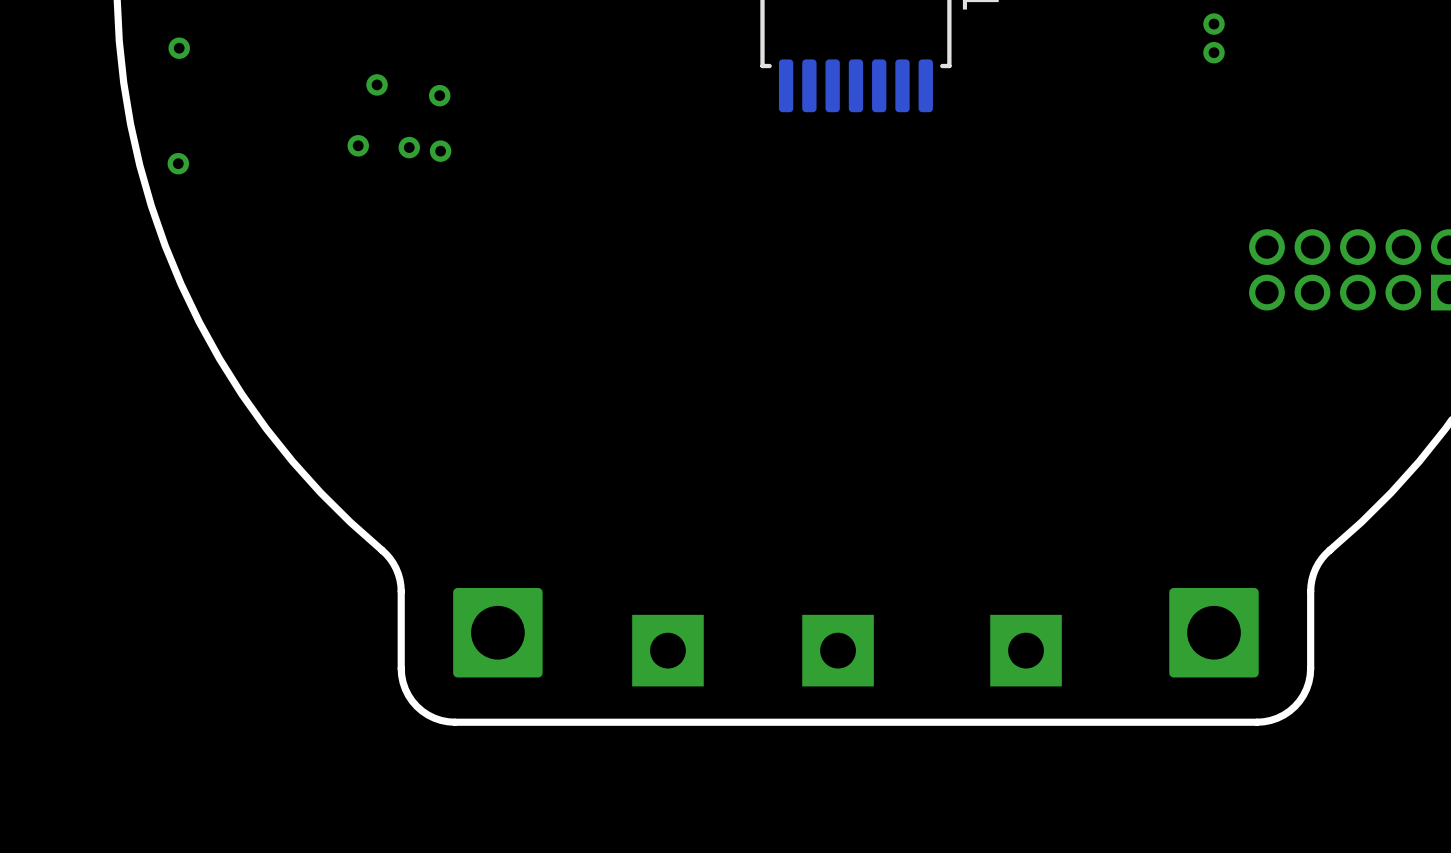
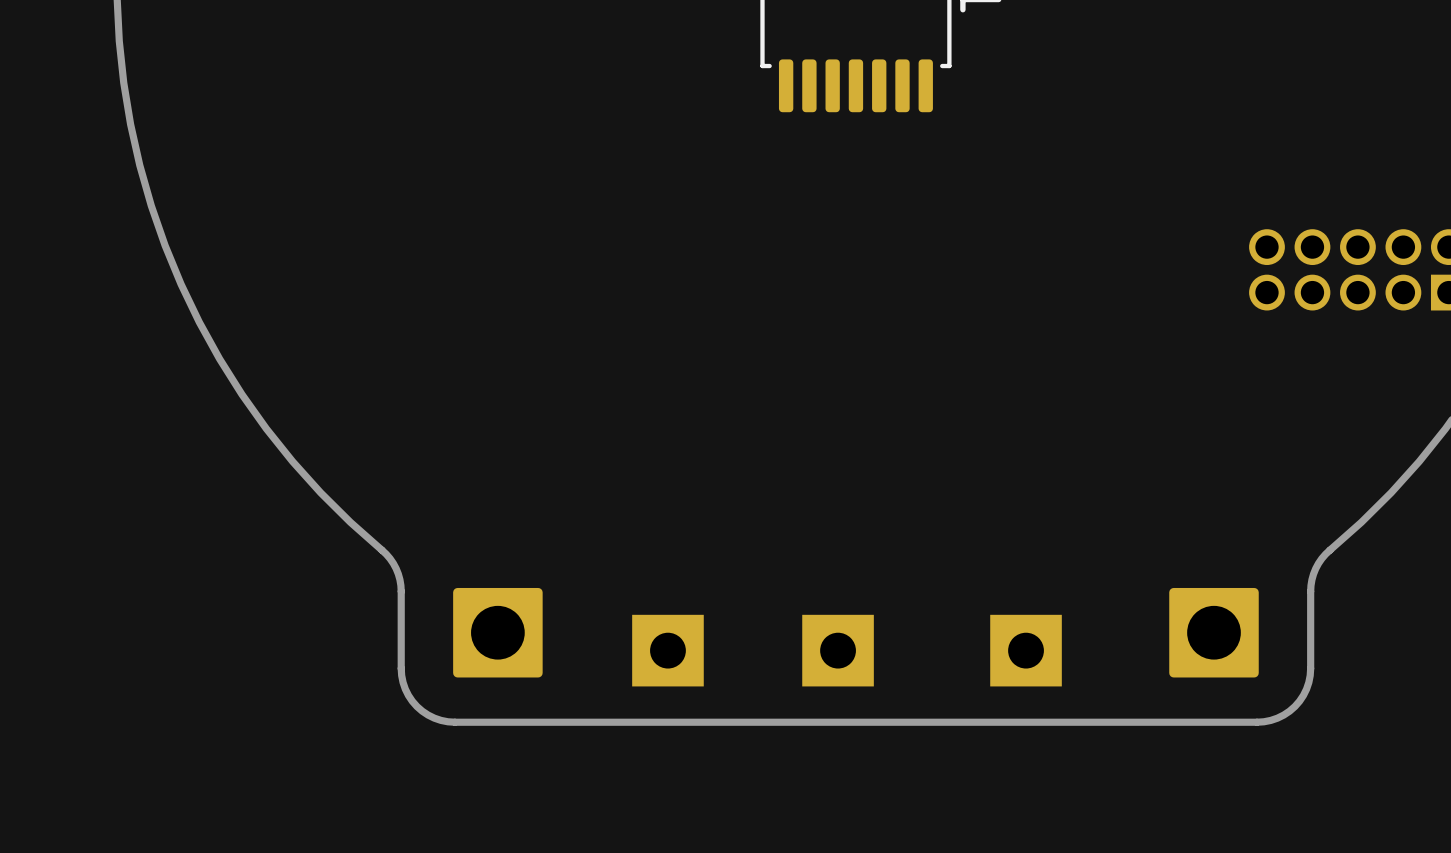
via: (1213, 24) -> none
via: (179, 48) -> none
via: (1213, 52) -> none
via: (377, 84) -> none
via: (439, 95) -> none
via: (358, 145) -> none
via: (409, 147) -> none
via: (440, 151) -> none
via: (178, 163) -> none

